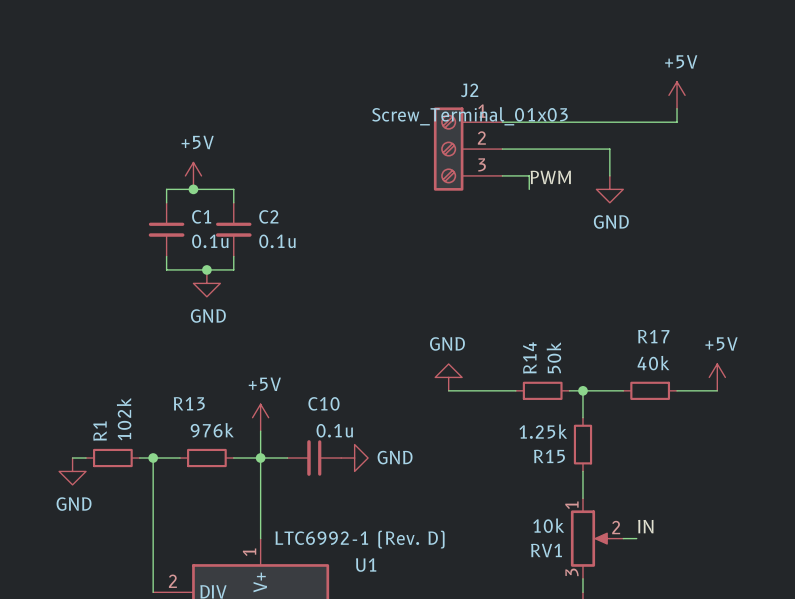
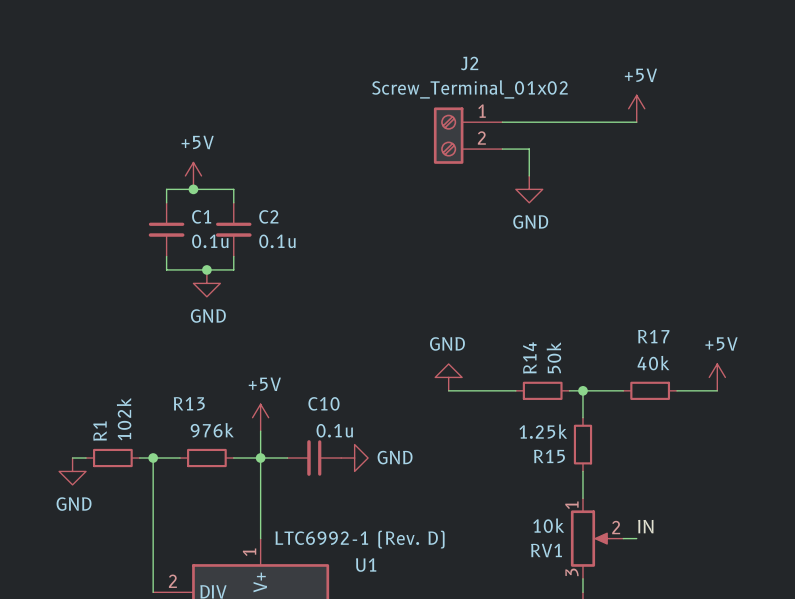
power symbol position: +5V (677, 95) -> +5V (636, 108)
J2 symbol: [433, 107, 503, 191] -> [433, 107, 503, 164]
wire: (677, 108) (677, 122) (636, 122) -> none
J2 value: Screw_Terminal_01x03 (469, 116) -> Screw_Terminal_01x02 (469, 89)
wire: (529, 149) (609, 149) (609, 175) -> (529, 149) (529, 175)
wire: (502, 175) (529, 175) (529, 189) -> none
label: PWM (550, 177) -> none
power symbol position: GND (609, 189) -> GND (529, 189)

